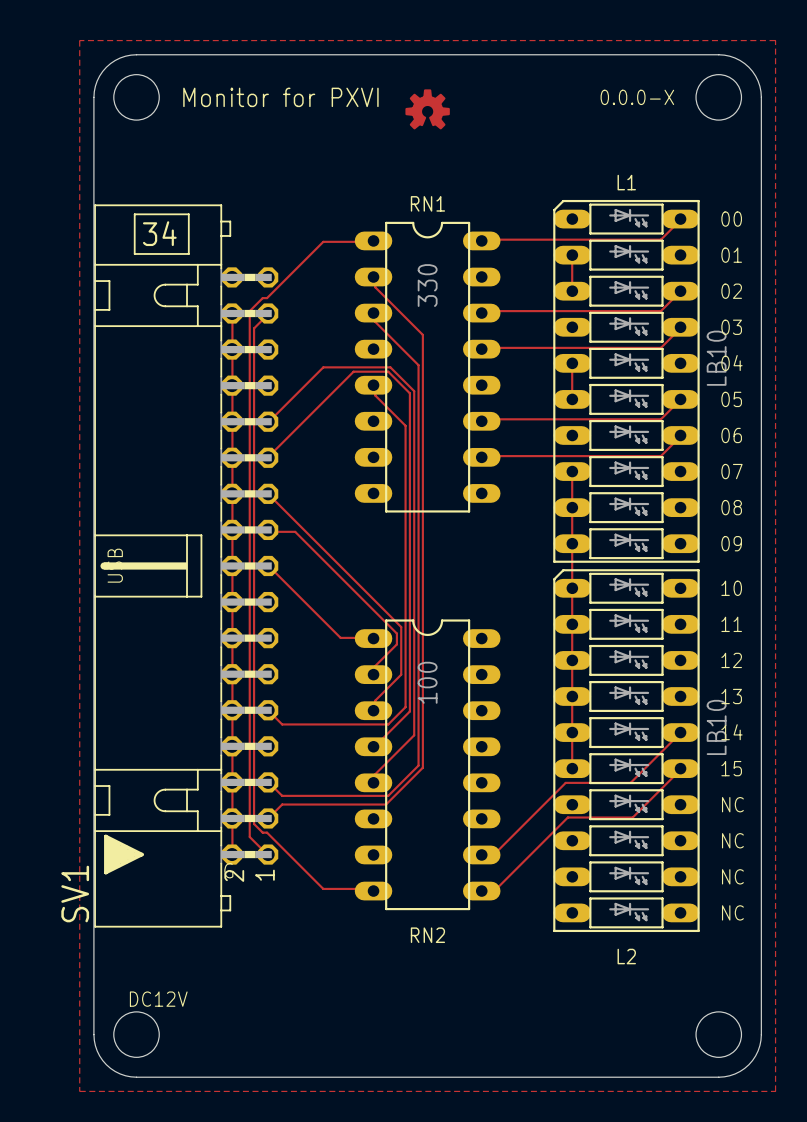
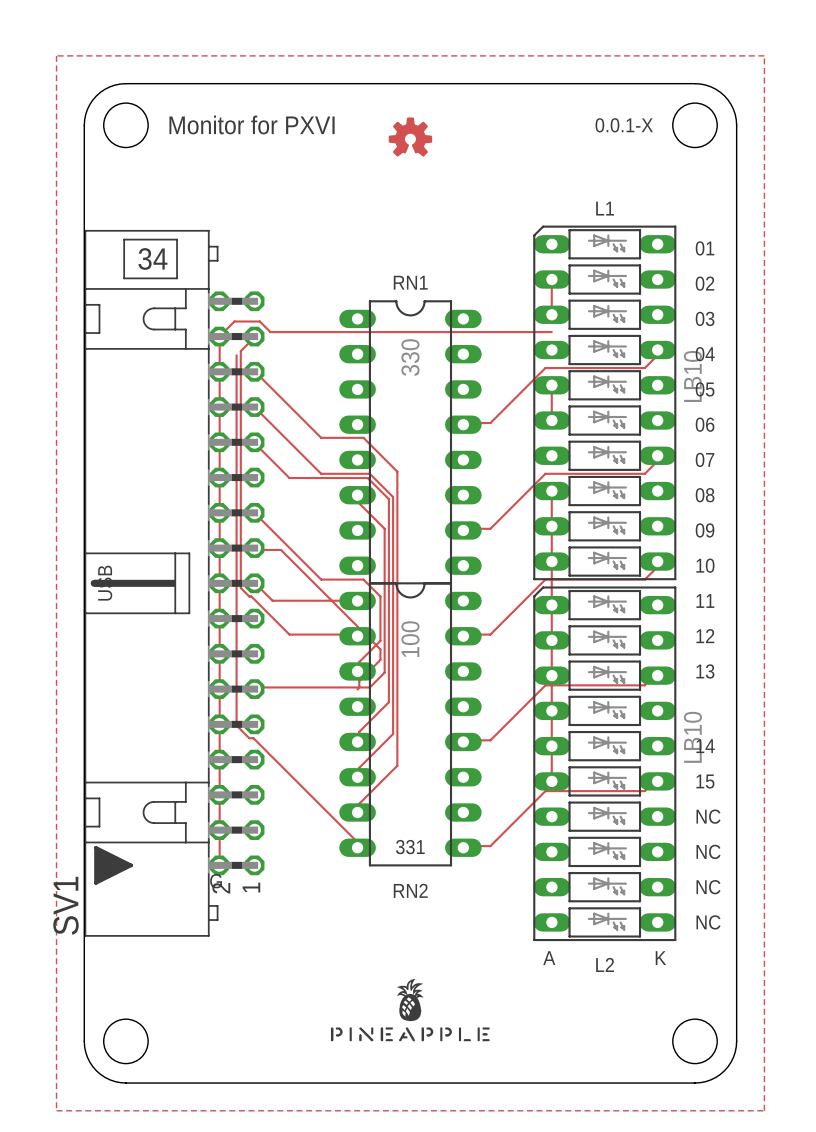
zone outline: (79, 40) (775, 40) (775, 1091) (79, 1091) (79, 40) -> (56, 55) (56, 1110) (764, 1110) (764, 55) (56, 55)
text: 0.0.0-X (637, 97) -> 0.0.1-X (624, 125)
track: (680, 219) (660, 239) (481, 240) -> none
text: 00 (731, 219) -> none
track: (373, 240) (323, 241) (267, 298) -> (551, 332) (270, 332) (259, 321) (253, 321)
text position: 01 (731, 255) -> 01 (705, 248)
track: (373, 277) (375, 287) (422, 334) (422, 767) (386, 804) (282, 804) (268, 818) -> none
track: (680, 291) (660, 311) (483, 311) (481, 313) -> none
text position: 02 (731, 291) -> 02 (705, 283)
track: (262, 298) (249, 311) (249, 332) -> (249, 321) (234, 321) (219, 336)
track: (373, 313) (375, 313) (375, 321) (418, 365) (418, 765) (388, 795) (282, 795) (268, 782) -> none
track: (680, 327) (660, 347) (481, 349) -> none
text position: 03 (731, 327) -> 03 (705, 318)
track: none -> (657, 354) (644, 368) (545, 368) (490, 423) (465, 423) (463, 424)
track: none -> (254, 371) (321, 437) (363, 437) (397, 471)
text position: 04 (731, 363) -> 04 (705, 354)
RN1 position: (427, 367) -> (410, 442)
track: (373, 385) (375, 395) (405, 425) (405, 479) -> none
track: (680, 399) (660, 419) (483, 419) (481, 421) -> none
text position: 05 (731, 399) -> 05 (705, 389)
track: (268, 421) (323, 367) (390, 367) (414, 391) (414, 451) -> (254, 442) (289, 478) (367, 478) (388, 499)
track: (680, 435) (660, 456) (481, 457) -> none
text position: 06 (731, 435) -> 06 (705, 424)
track: none -> (657, 459) (644, 473) (545, 473) (490, 528) (465, 528) (463, 530)
track: (268, 457) (353, 371) (388, 371) (409, 393) (409, 477) -> (254, 407) (321, 473) (369, 473) (393, 497)
text position: 07 (731, 471) -> 07 (705, 459)
track: none -> (357, 495) (359, 503) (384, 528) (384, 643)
text position: 08 (731, 507) -> 08 (705, 495)
text position: 09 (731, 543) -> 09 (705, 530)
track: none -> (657, 565) (644, 579) (545, 579) (490, 634) (465, 634) (463, 636)
track: (336, 562) (401, 627) -> (321, 579) (363, 579) (380, 596) (380, 640) (359, 662) (357, 671)
track: (254, 570) (254, 824) (262, 832) (267, 832) (323, 888) (373, 888) (373, 891) -> (240, 588) (289, 634) (357, 634) (357, 636)
track: (286, 583) (340, 637) (373, 638) -> (272, 600) (357, 600)
text position: 10 (731, 588) -> 10 (705, 565)
text position: 11 (731, 624) -> 11 (705, 600)
track: none -> (657, 671) (644, 685) (545, 685) (490, 740) (465, 740) (463, 741)
track: (401, 657) (401, 674) (375, 700) (373, 710) -> (384, 672) (369, 687) (255, 687) (254, 689)
text position: 12 (731, 660) -> 12 (705, 636)
track: (405, 687) (405, 707) (388, 724) (282, 724) (268, 710) -> (388, 702) (359, 731) (357, 741)
text position: 13 (731, 696) -> 13 (705, 671)
track: (249, 711) (249, 836) (268, 854) -> (236, 725) (249, 738) (253, 738) (357, 841) (357, 847)
track: (409, 711) (373, 746) -> (393, 725) (393, 733) (359, 767) (357, 777)
track: (680, 732) (630, 782) (565, 782) (494, 854) (481, 854) -> none
track: (414, 735) (375, 774) (373, 782) -> (397, 748) (397, 765) (359, 803) (359, 812) (357, 812)
RN2 position: (427, 764) -> (410, 724)
track: none -> (657, 777) (644, 791) (545, 791) (490, 846) (465, 846) (463, 847)
track: (680, 768) (632, 817) (567, 817) (496, 888) (483, 888) (481, 891) -> none
text: none -> 331 (410, 847)
text: none -> A (549, 958)
text: none -> K (660, 958)
drawing: none -> [330, 978, 490, 1042]
text: DC12V (158, 999) -> none

